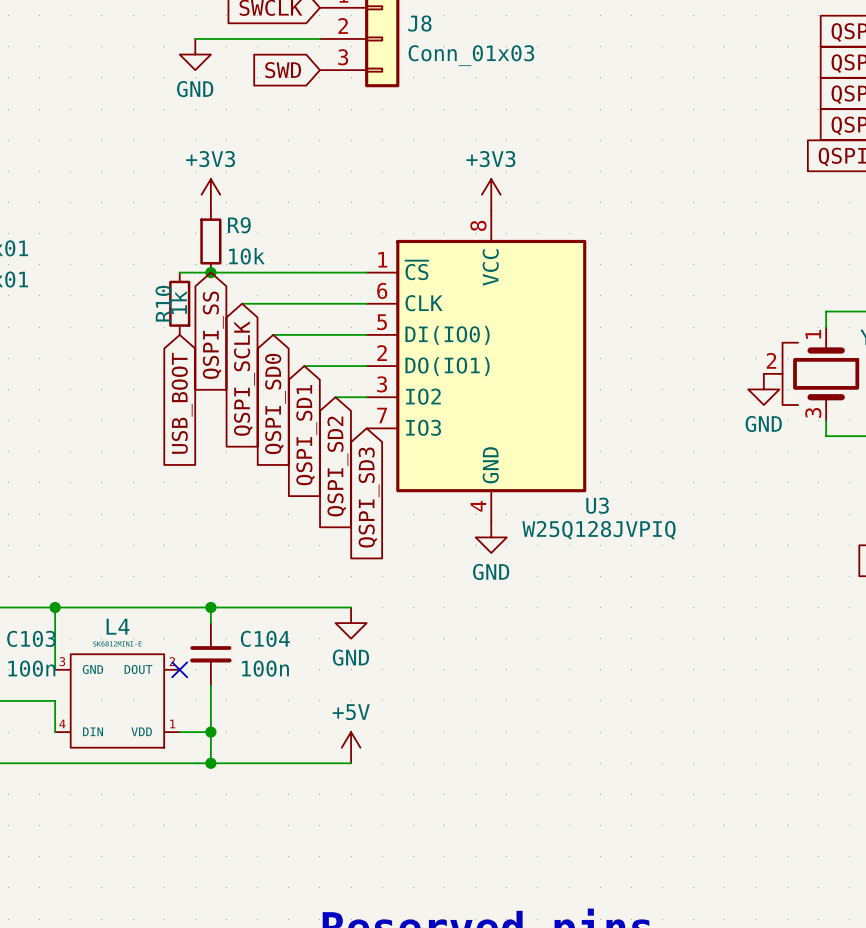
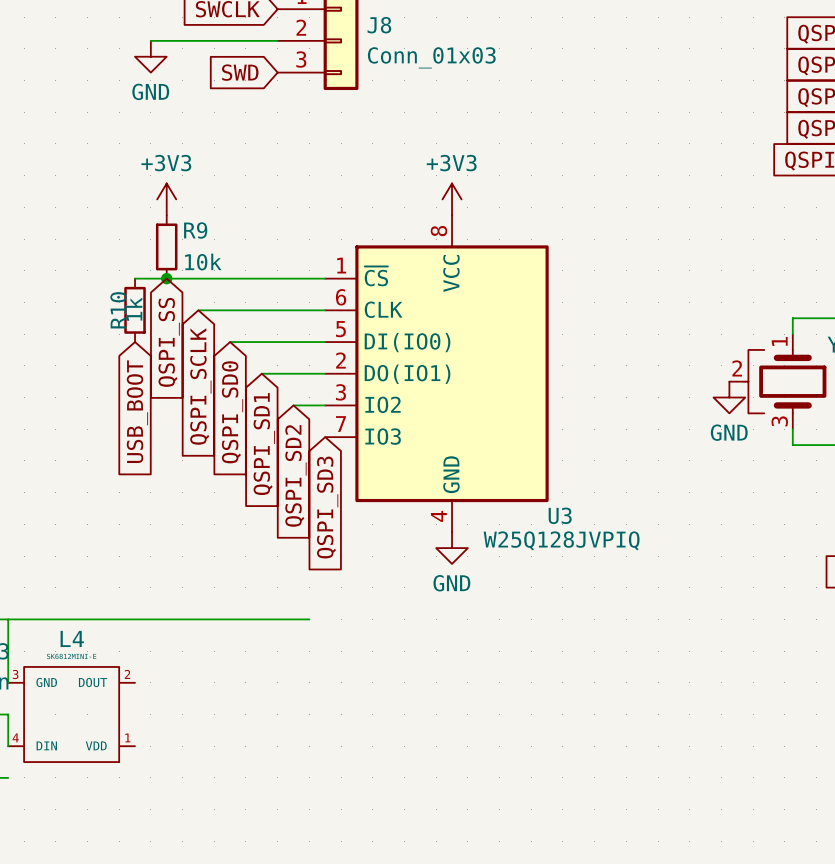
junction: (55, 607) -> none
wire: (210, 607) (210, 623) -> none
junction: (210, 607) -> none
power symbol: GND (351, 623) -> none
C104: 100n (210, 654) -> none
no-connect mark: (179, 669) -> none
wire: (210, 685) (210, 763) -> none
wire: (179, 732) (210, 732) -> none
junction: (210, 732) -> none
power symbol: +5V (351, 747) -> none
wire: (55, 763) (351, 763) -> none
junction: (210, 763) -> none

